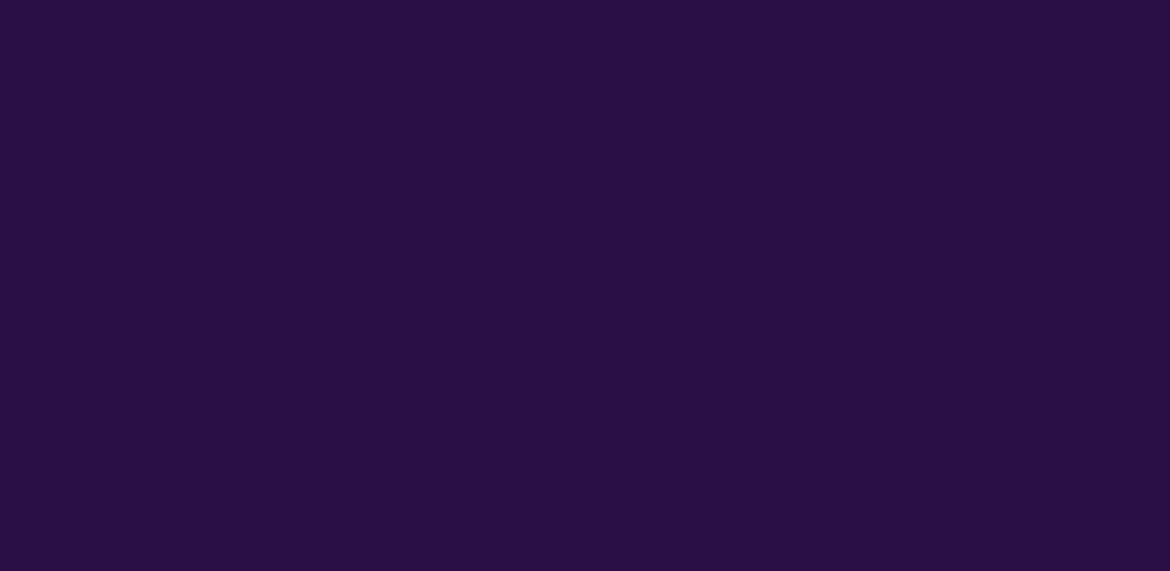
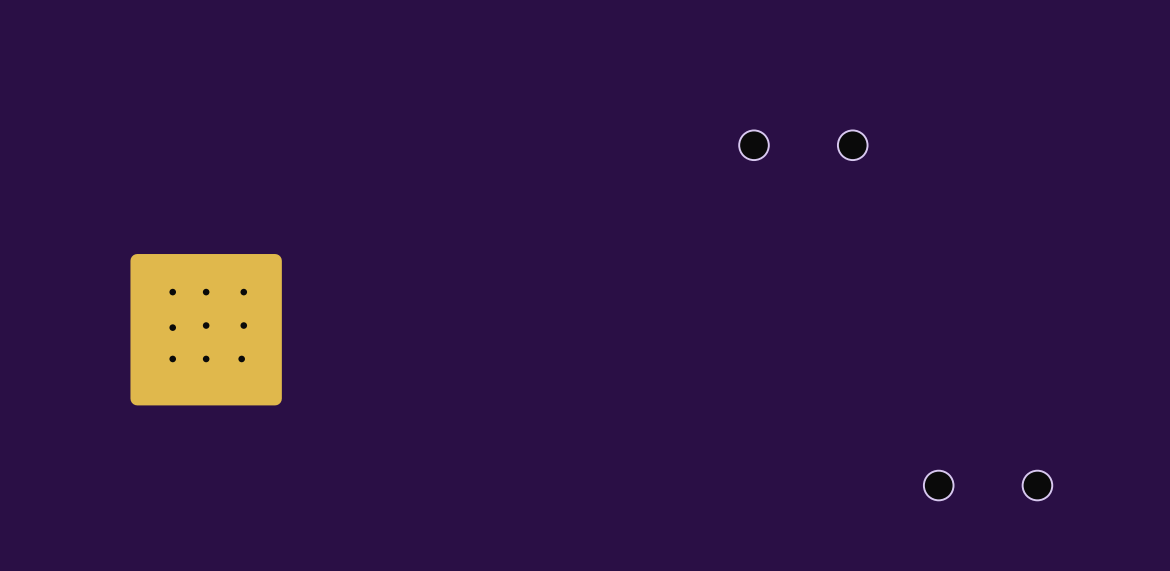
part: none -> (803, 145)
part: none -> (206, 329)
part: none -> (988, 485)

